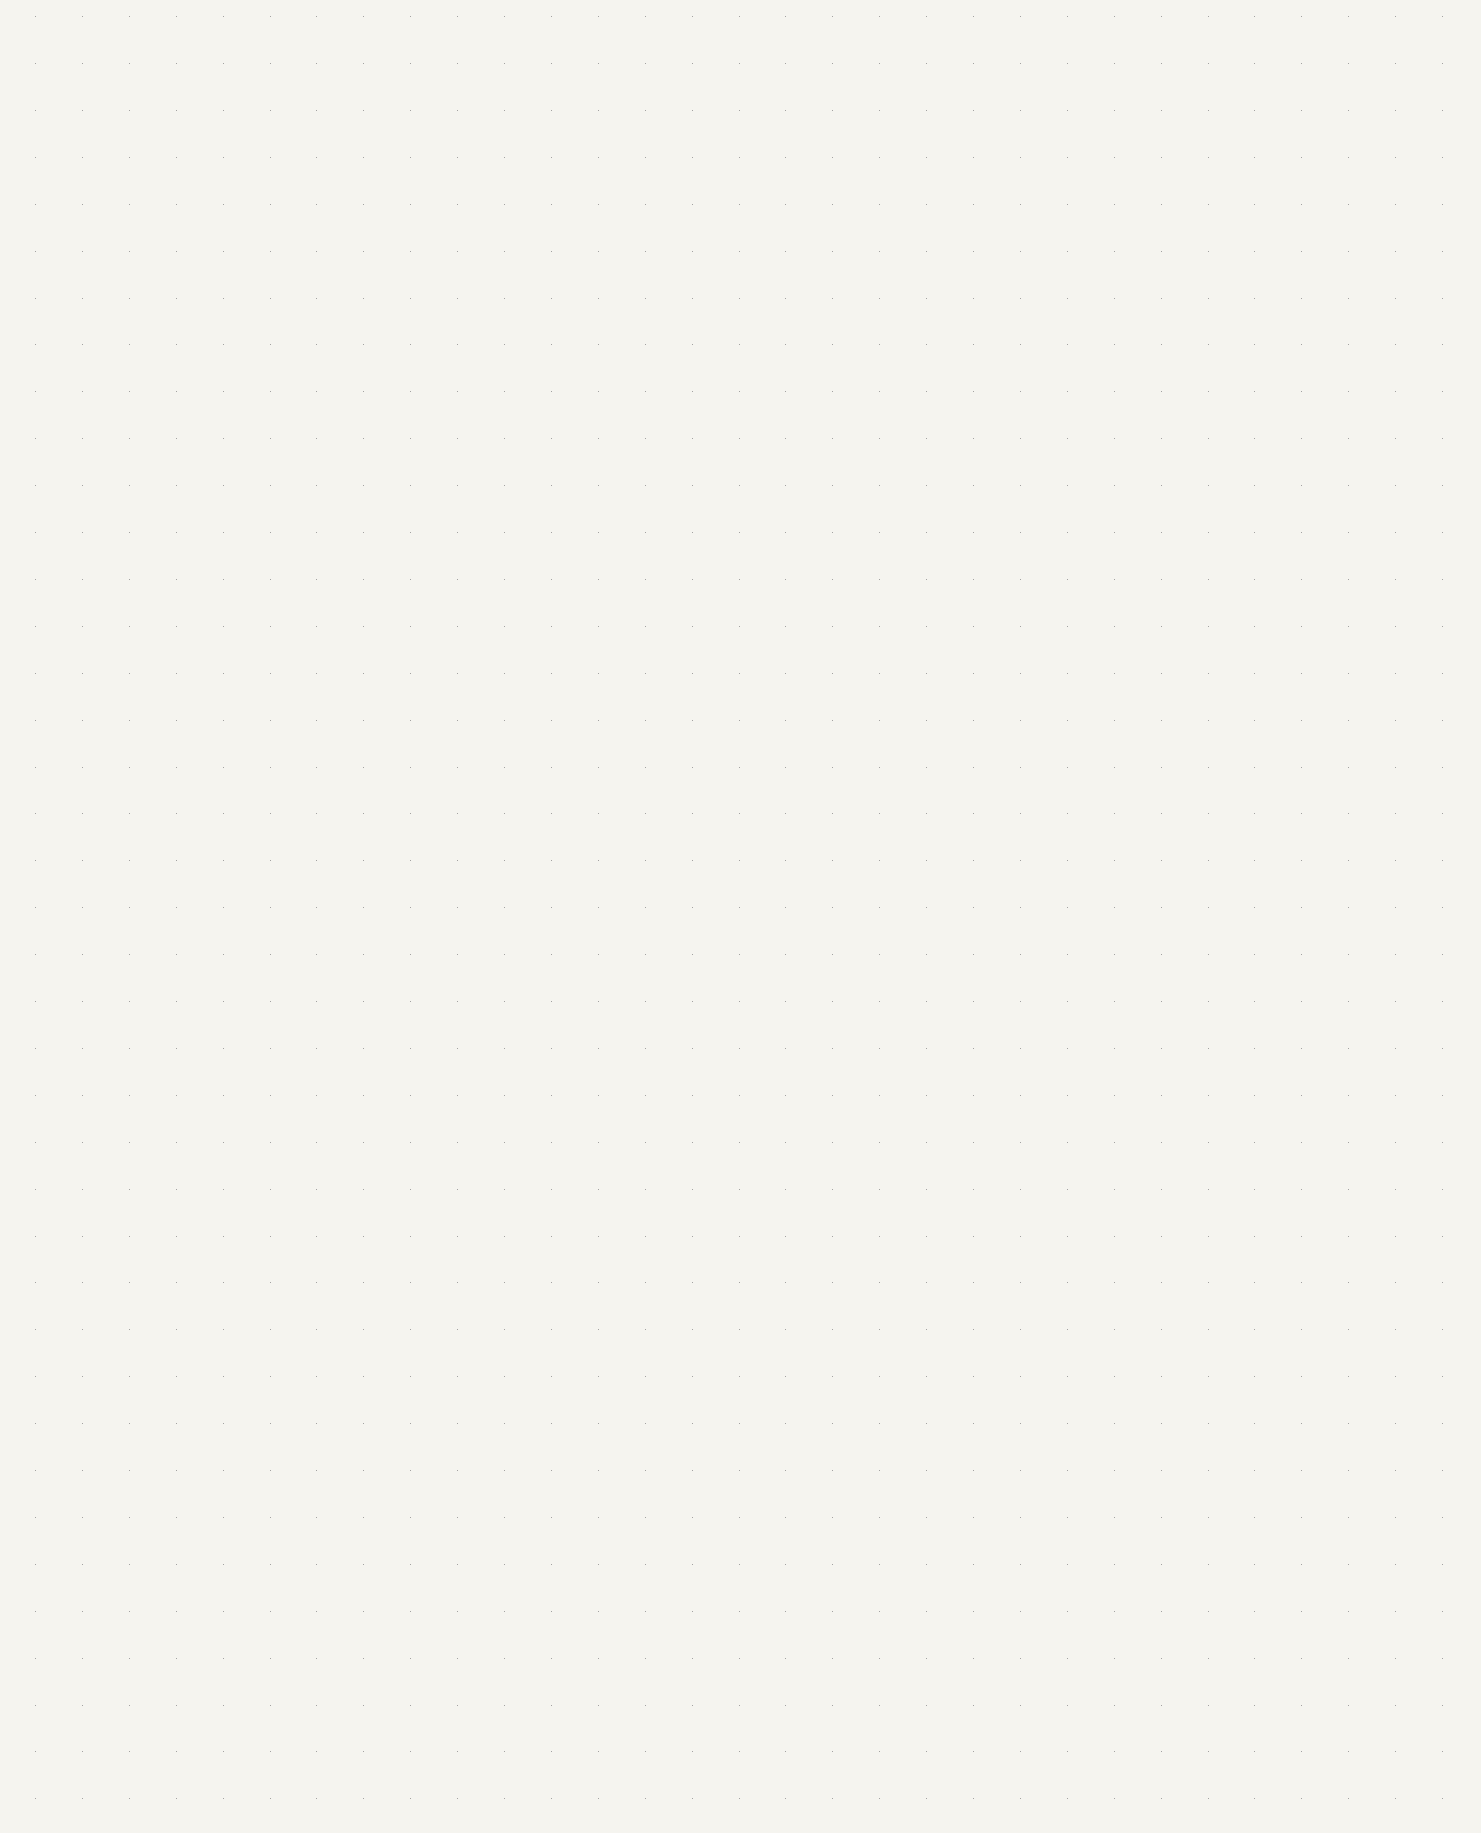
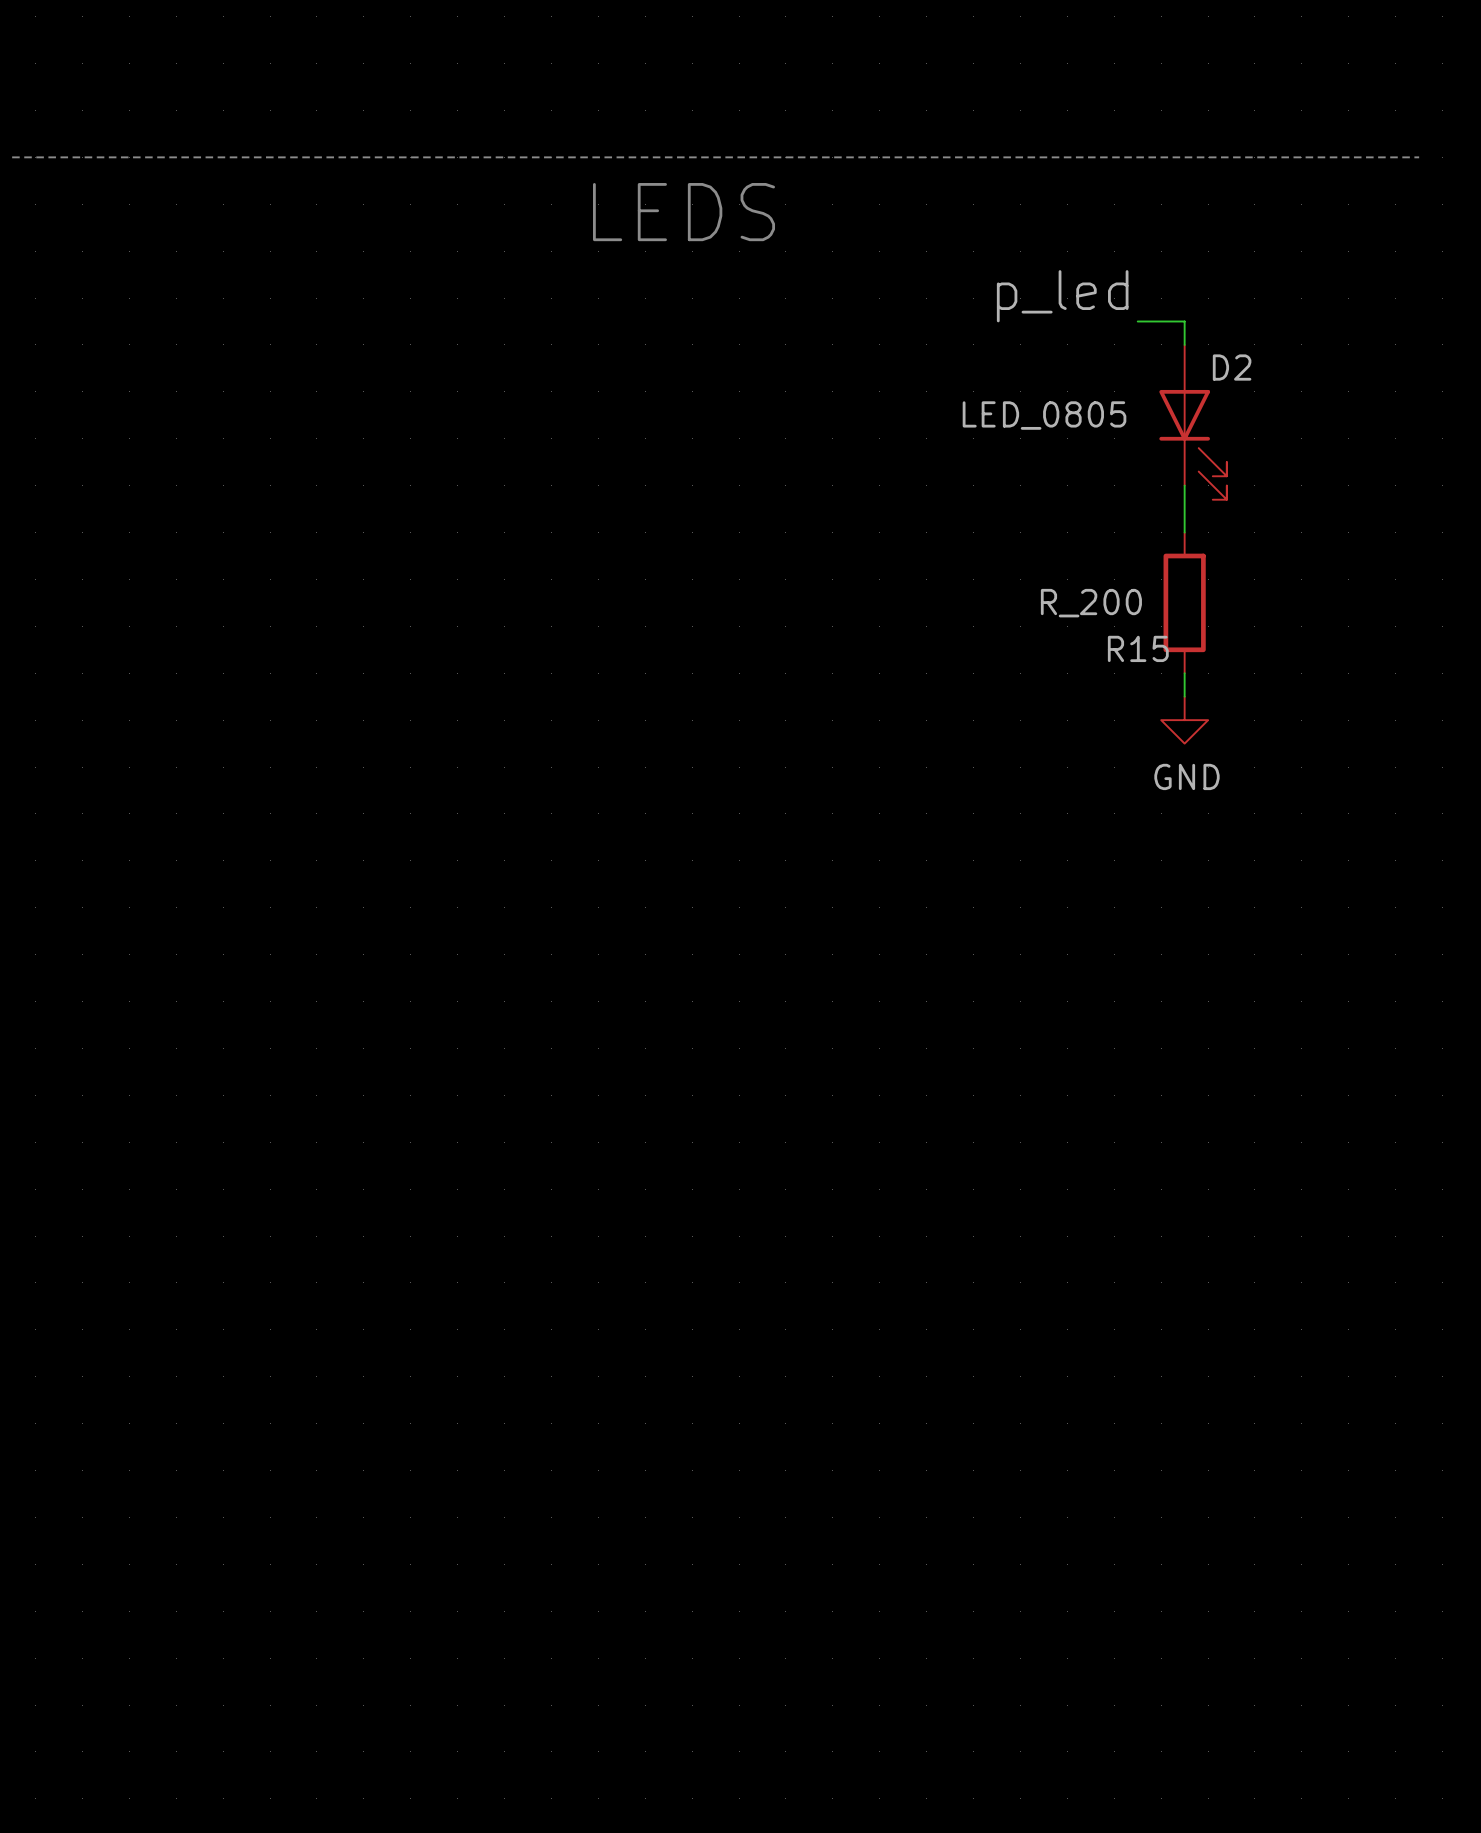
line: none -> (12, 157) (1419, 157)
text: none -> LEDS (684, 212)
label: none -> p_led (1062, 296)
wire: none -> (1137, 321) (1184, 321) (1184, 344)
D2: none -> LED_0805 (1193, 422)
wire: none -> (1184, 485) (1184, 532)
R15: none -> R_200 (1184, 602)
wire: none -> (1184, 673) (1184, 696)
power symbol: none -> GND (1184, 720)

